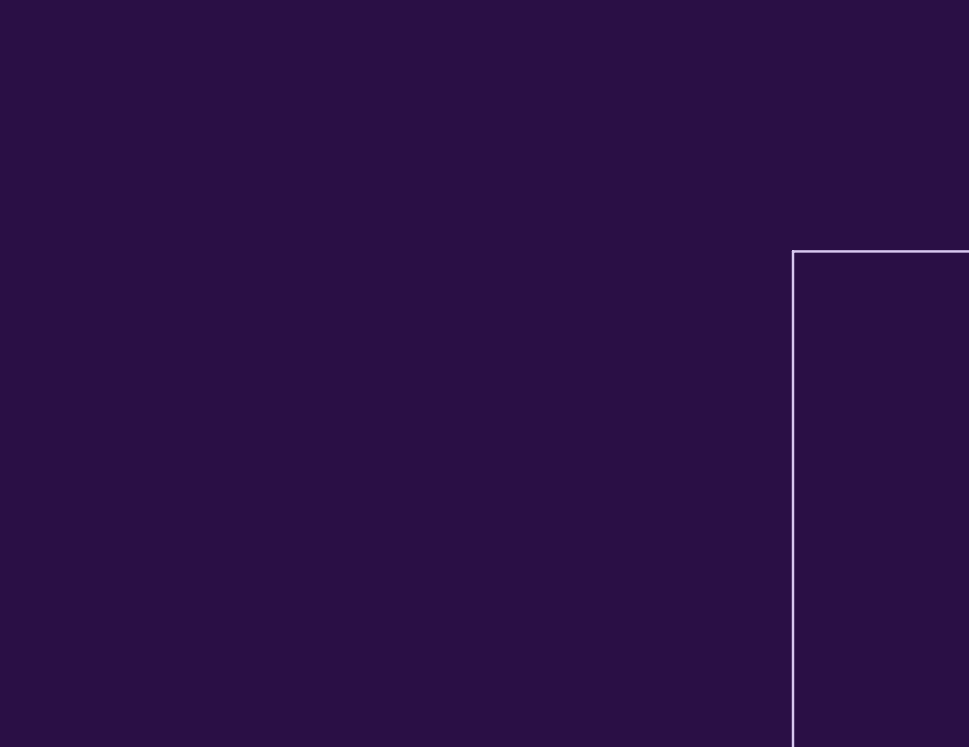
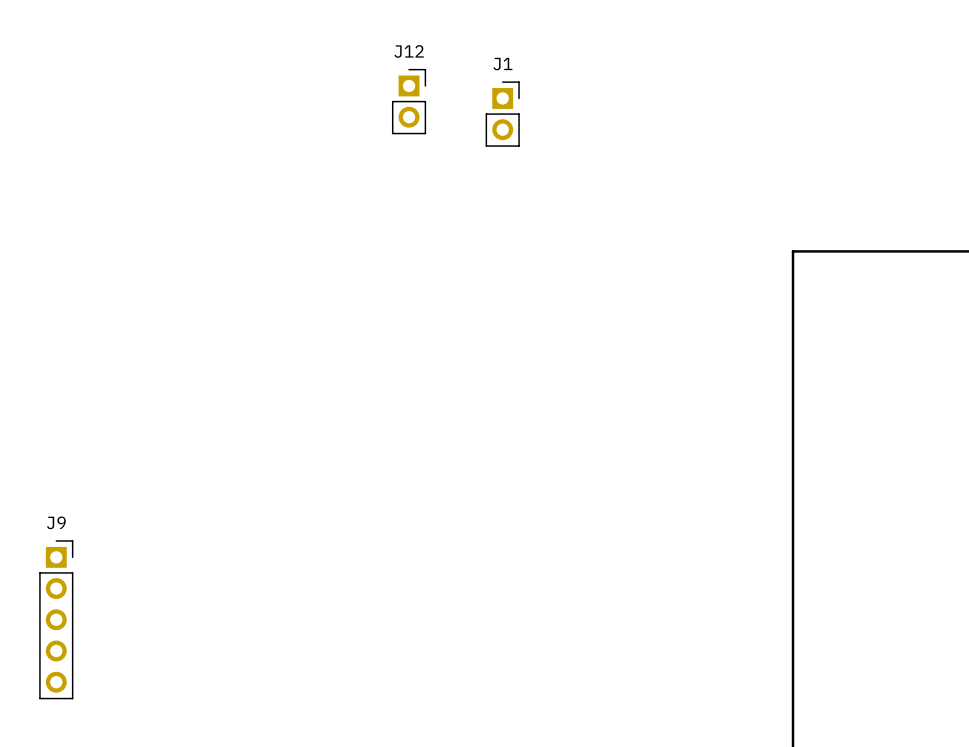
J12: none -> (409, 101)
J1: none -> (502, 114)
J9: none -> (56, 619)

